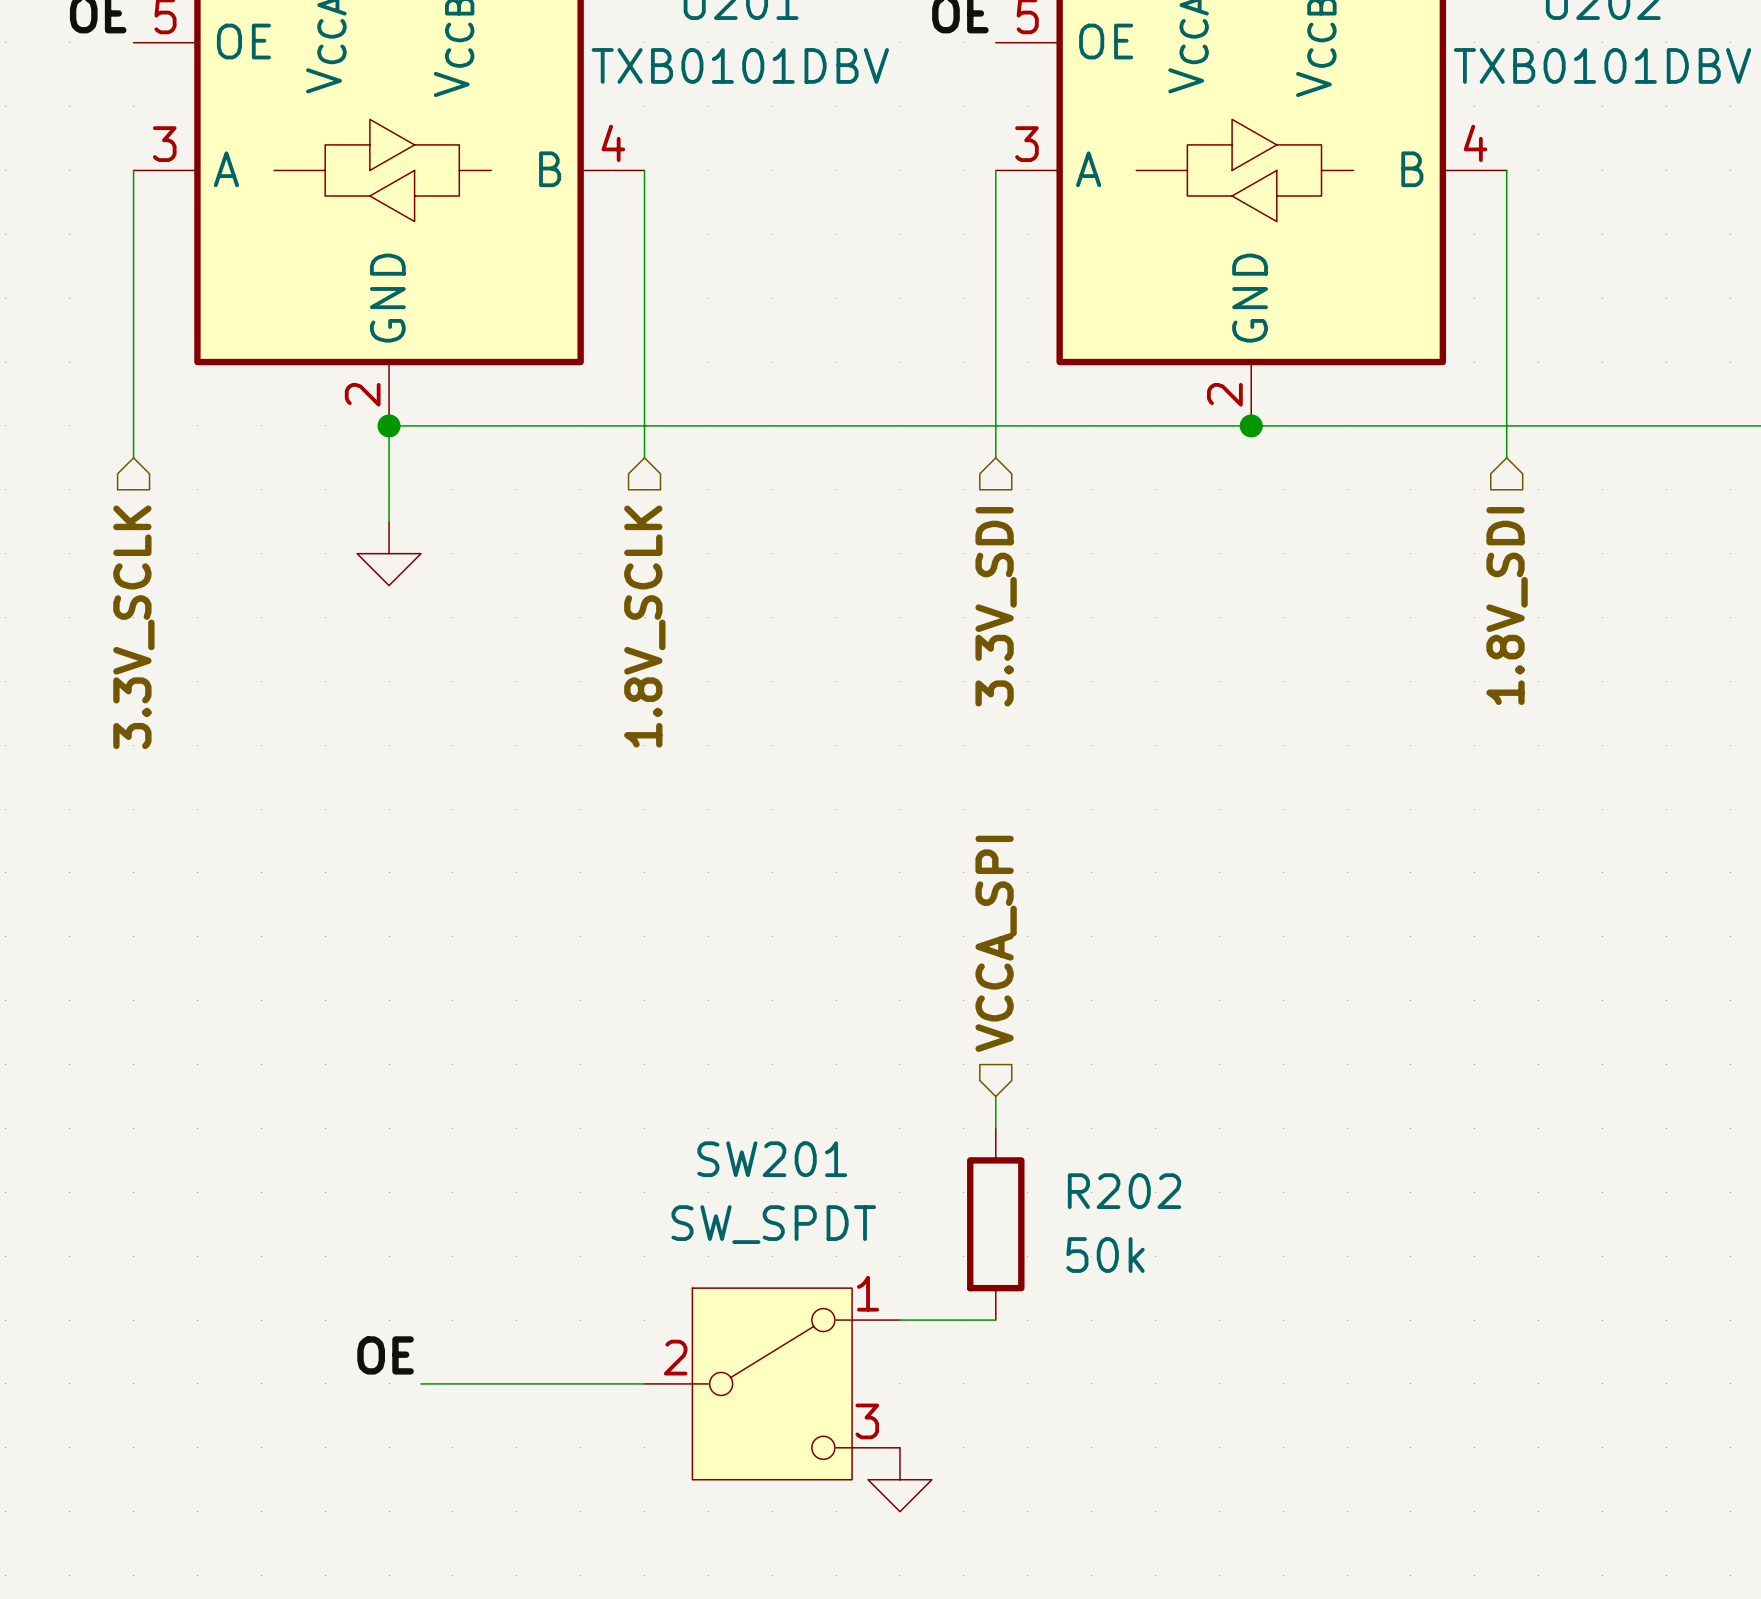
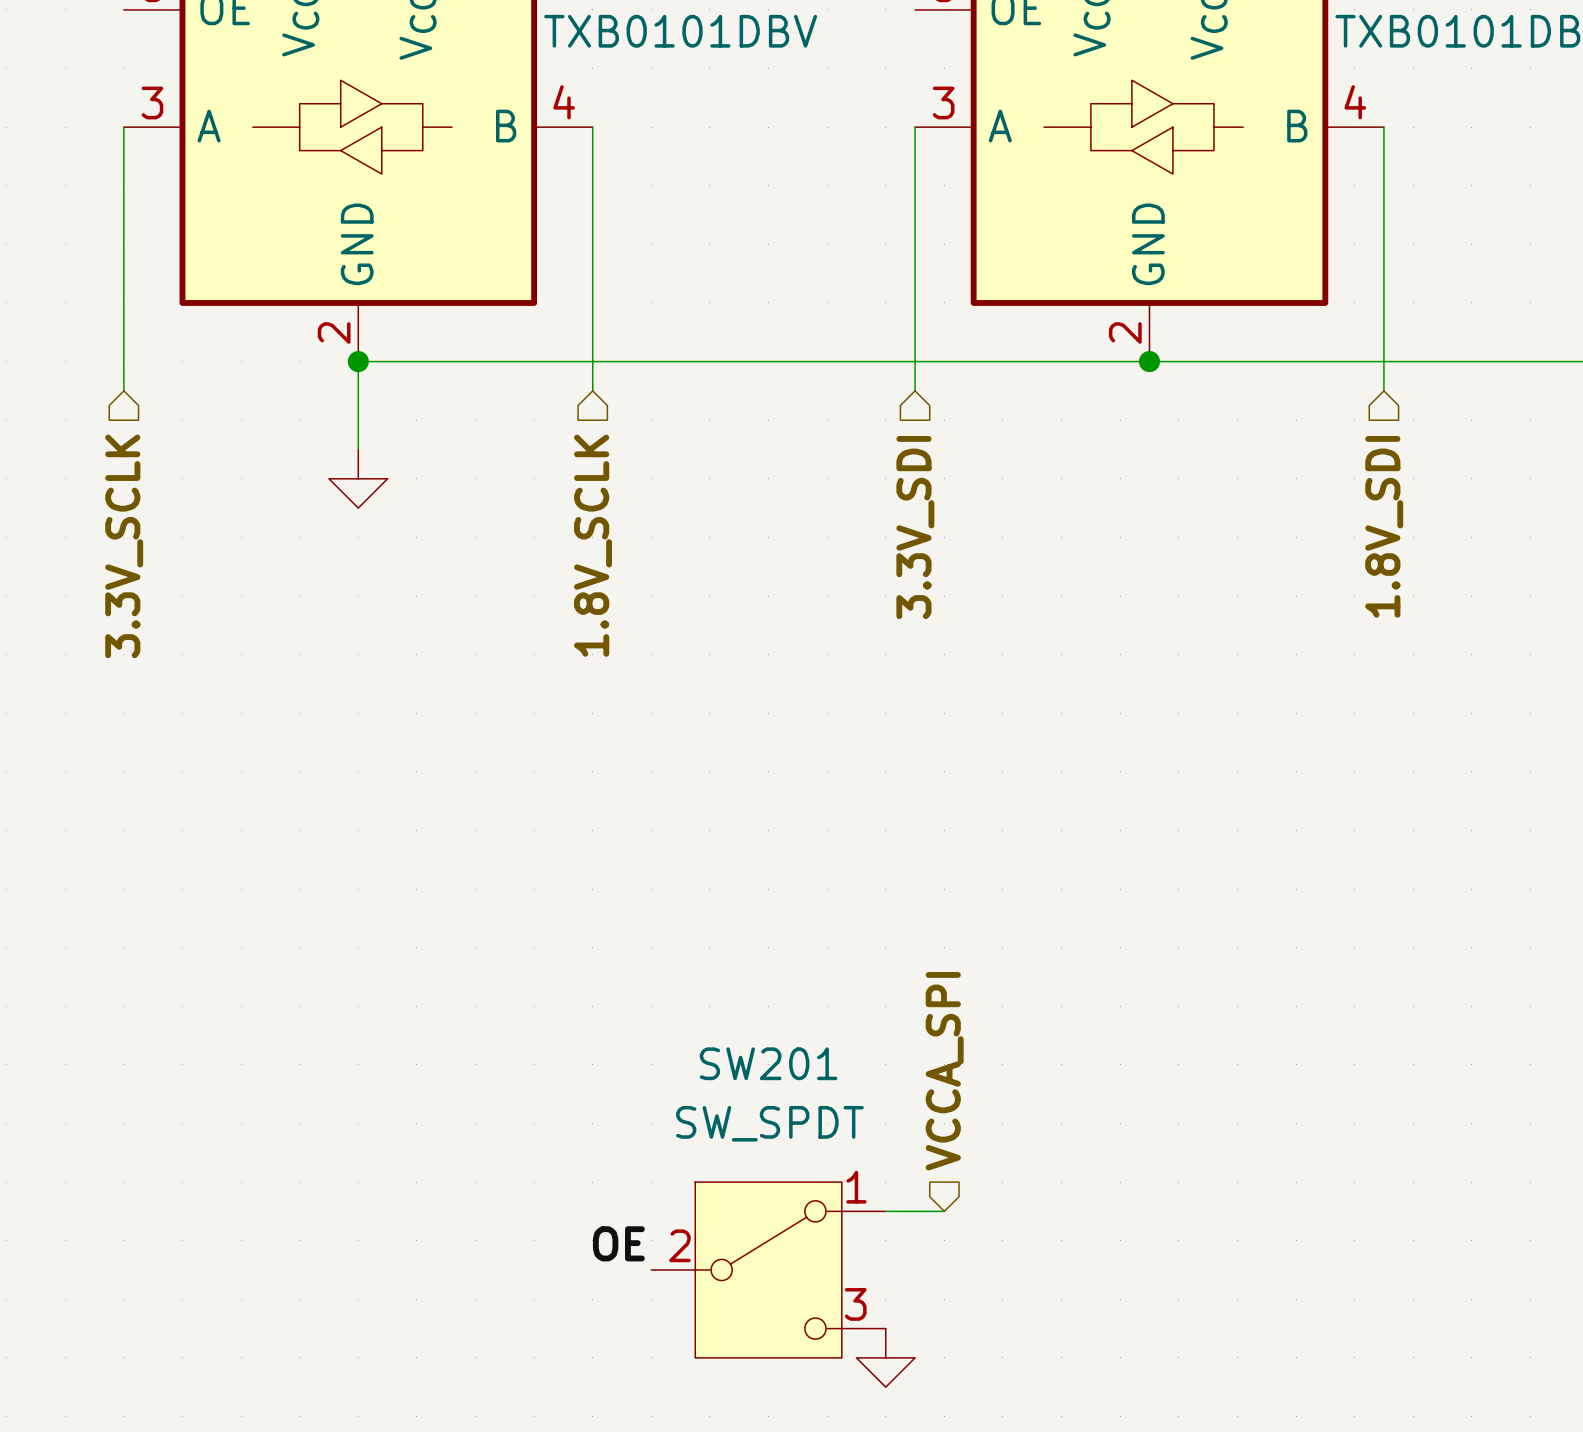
hierarchical label position: VCCA_SPI (996, 943) -> VCCA_SPI (944, 1071)
wire: (995, 1096) (995, 1128) -> none
R202: 50k (995, 1224) -> none
wire: (899, 1320) (995, 1320) -> none
wire: none -> (885, 1211) (944, 1211)
label position: OE (385, 1355) -> OE (618, 1243)
wire: (420, 1383) (644, 1383) -> none
SW201 position: (772, 1383) -> (768, 1269)
power symbol position: (899, 1479) -> (885, 1357)

